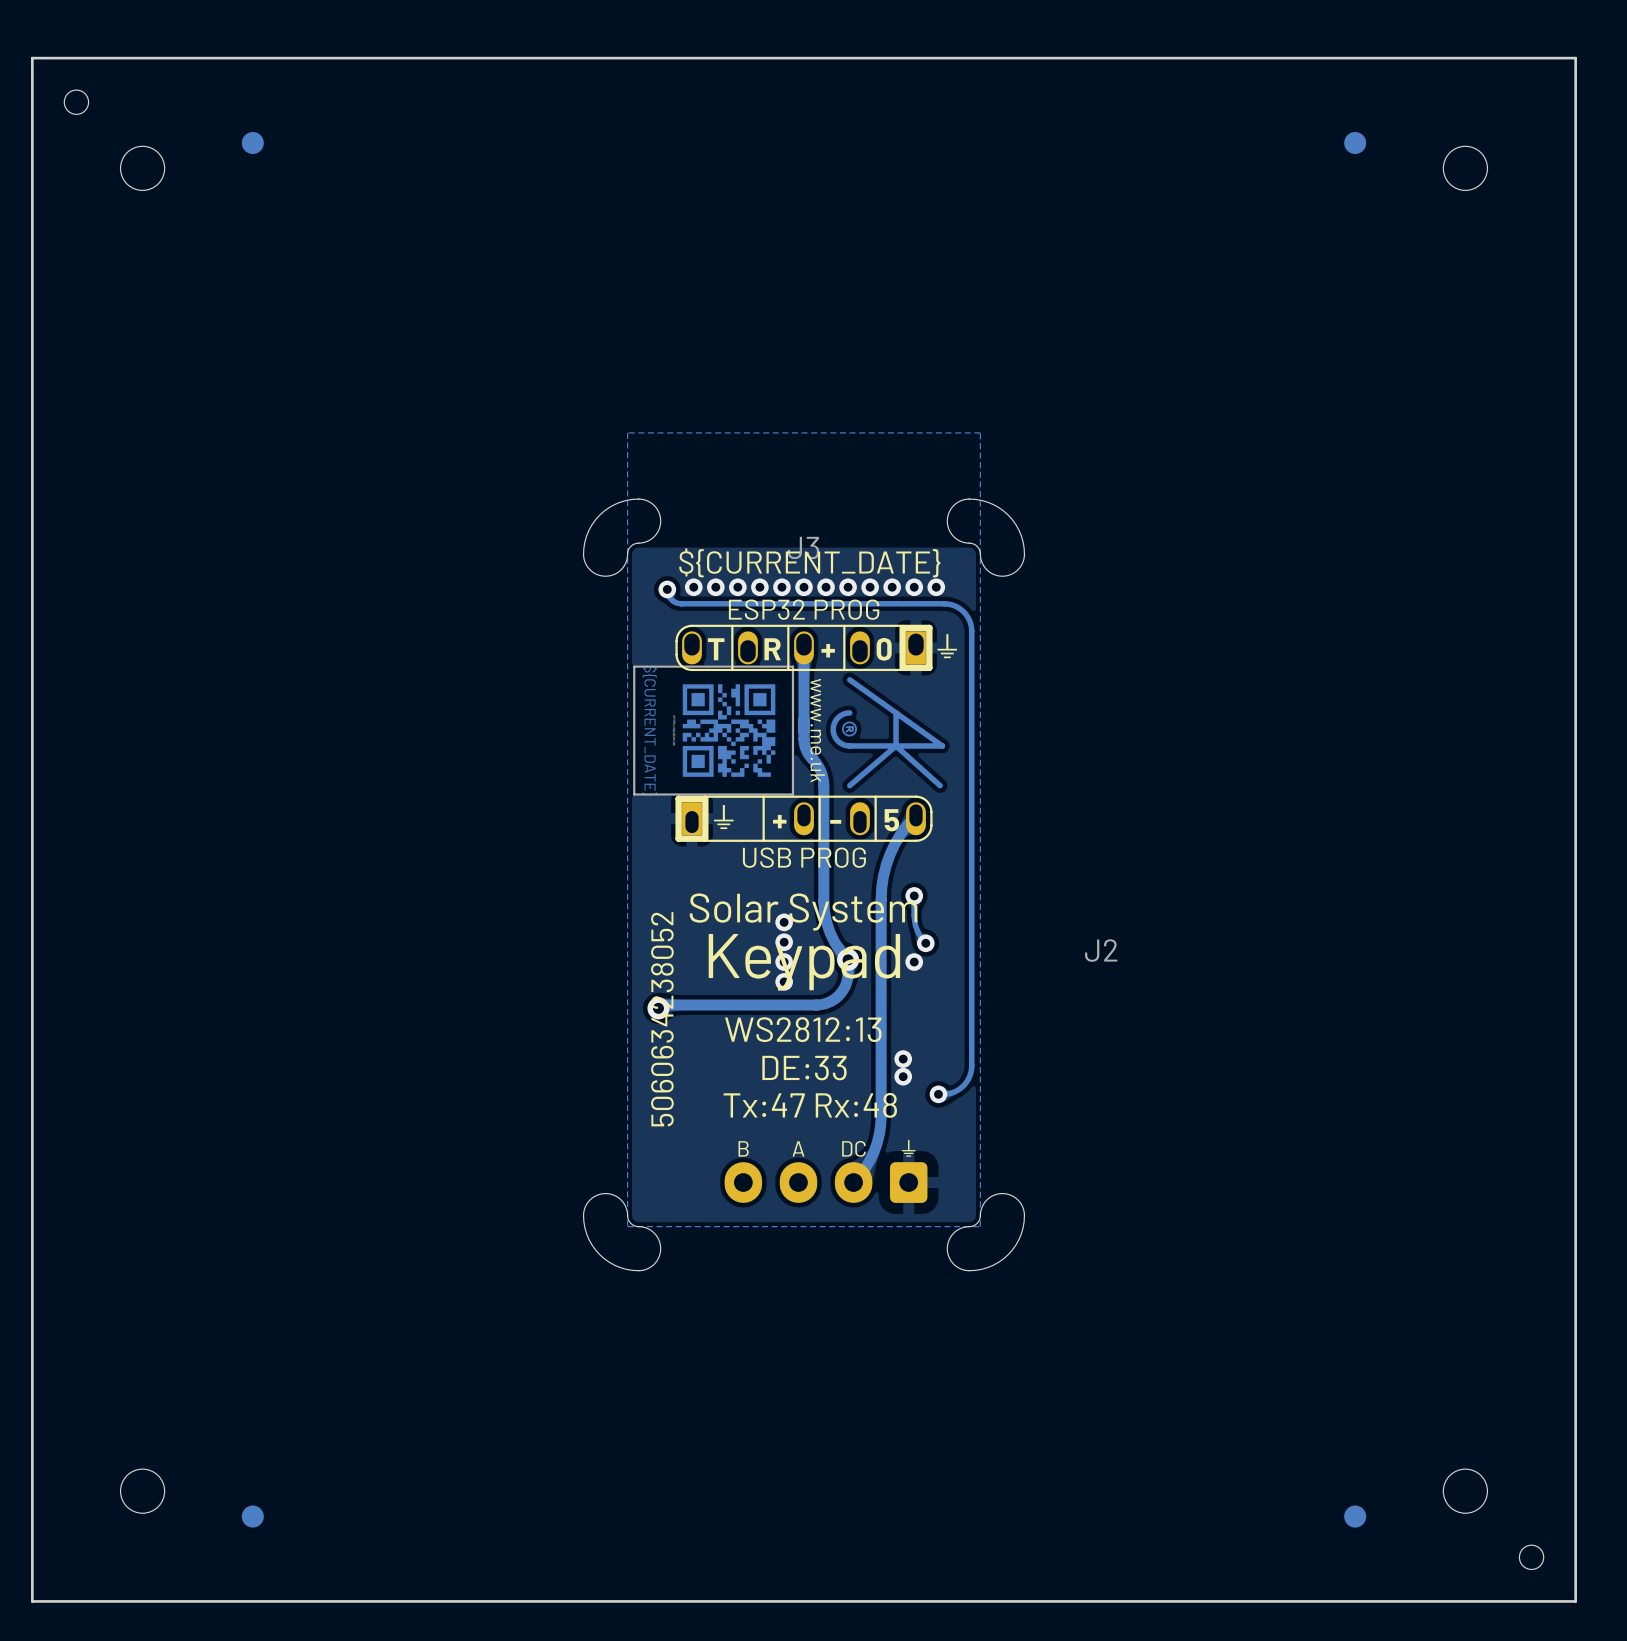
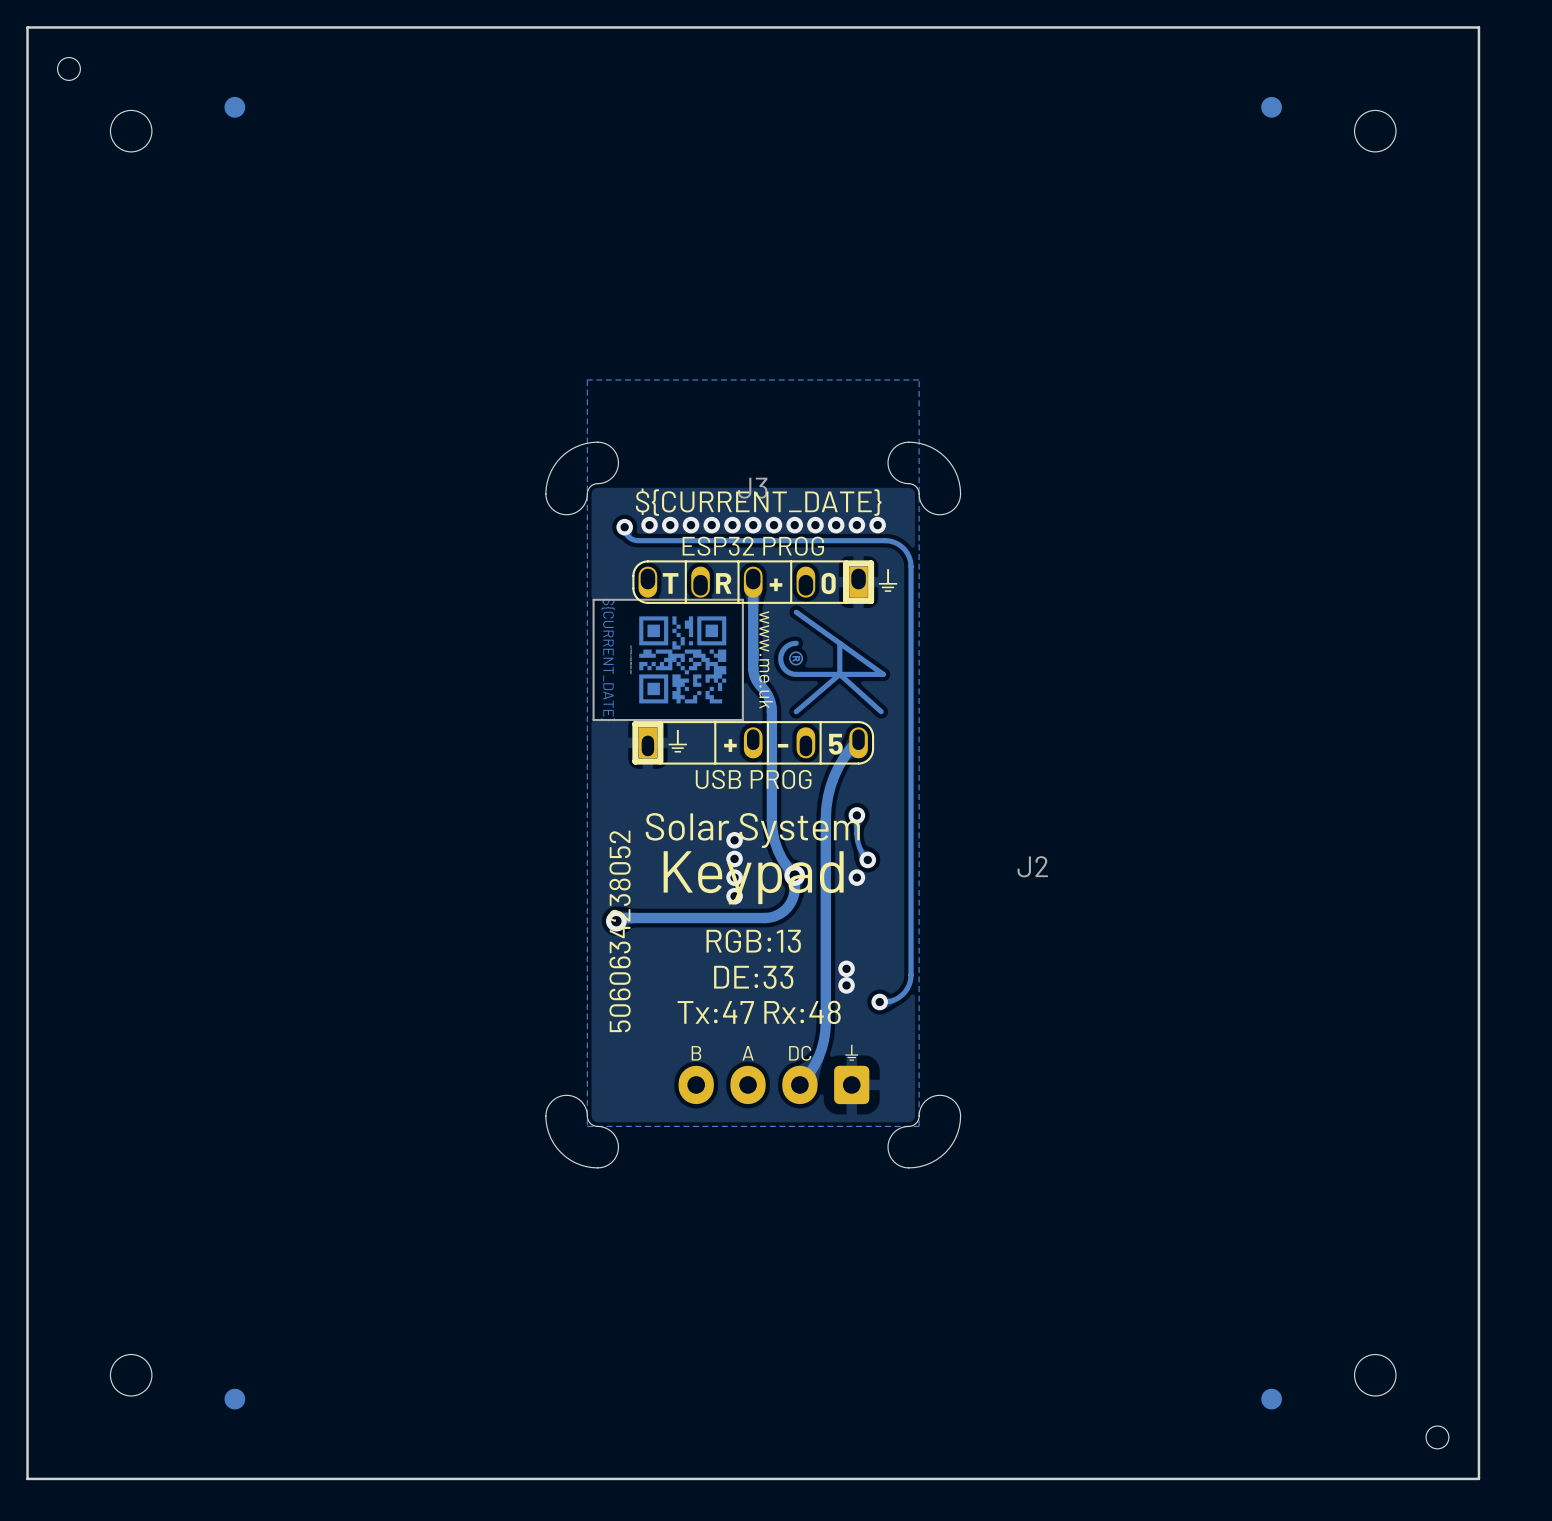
text: WS2812:13 (803, 1029) -> RGB:13 (753, 941)

